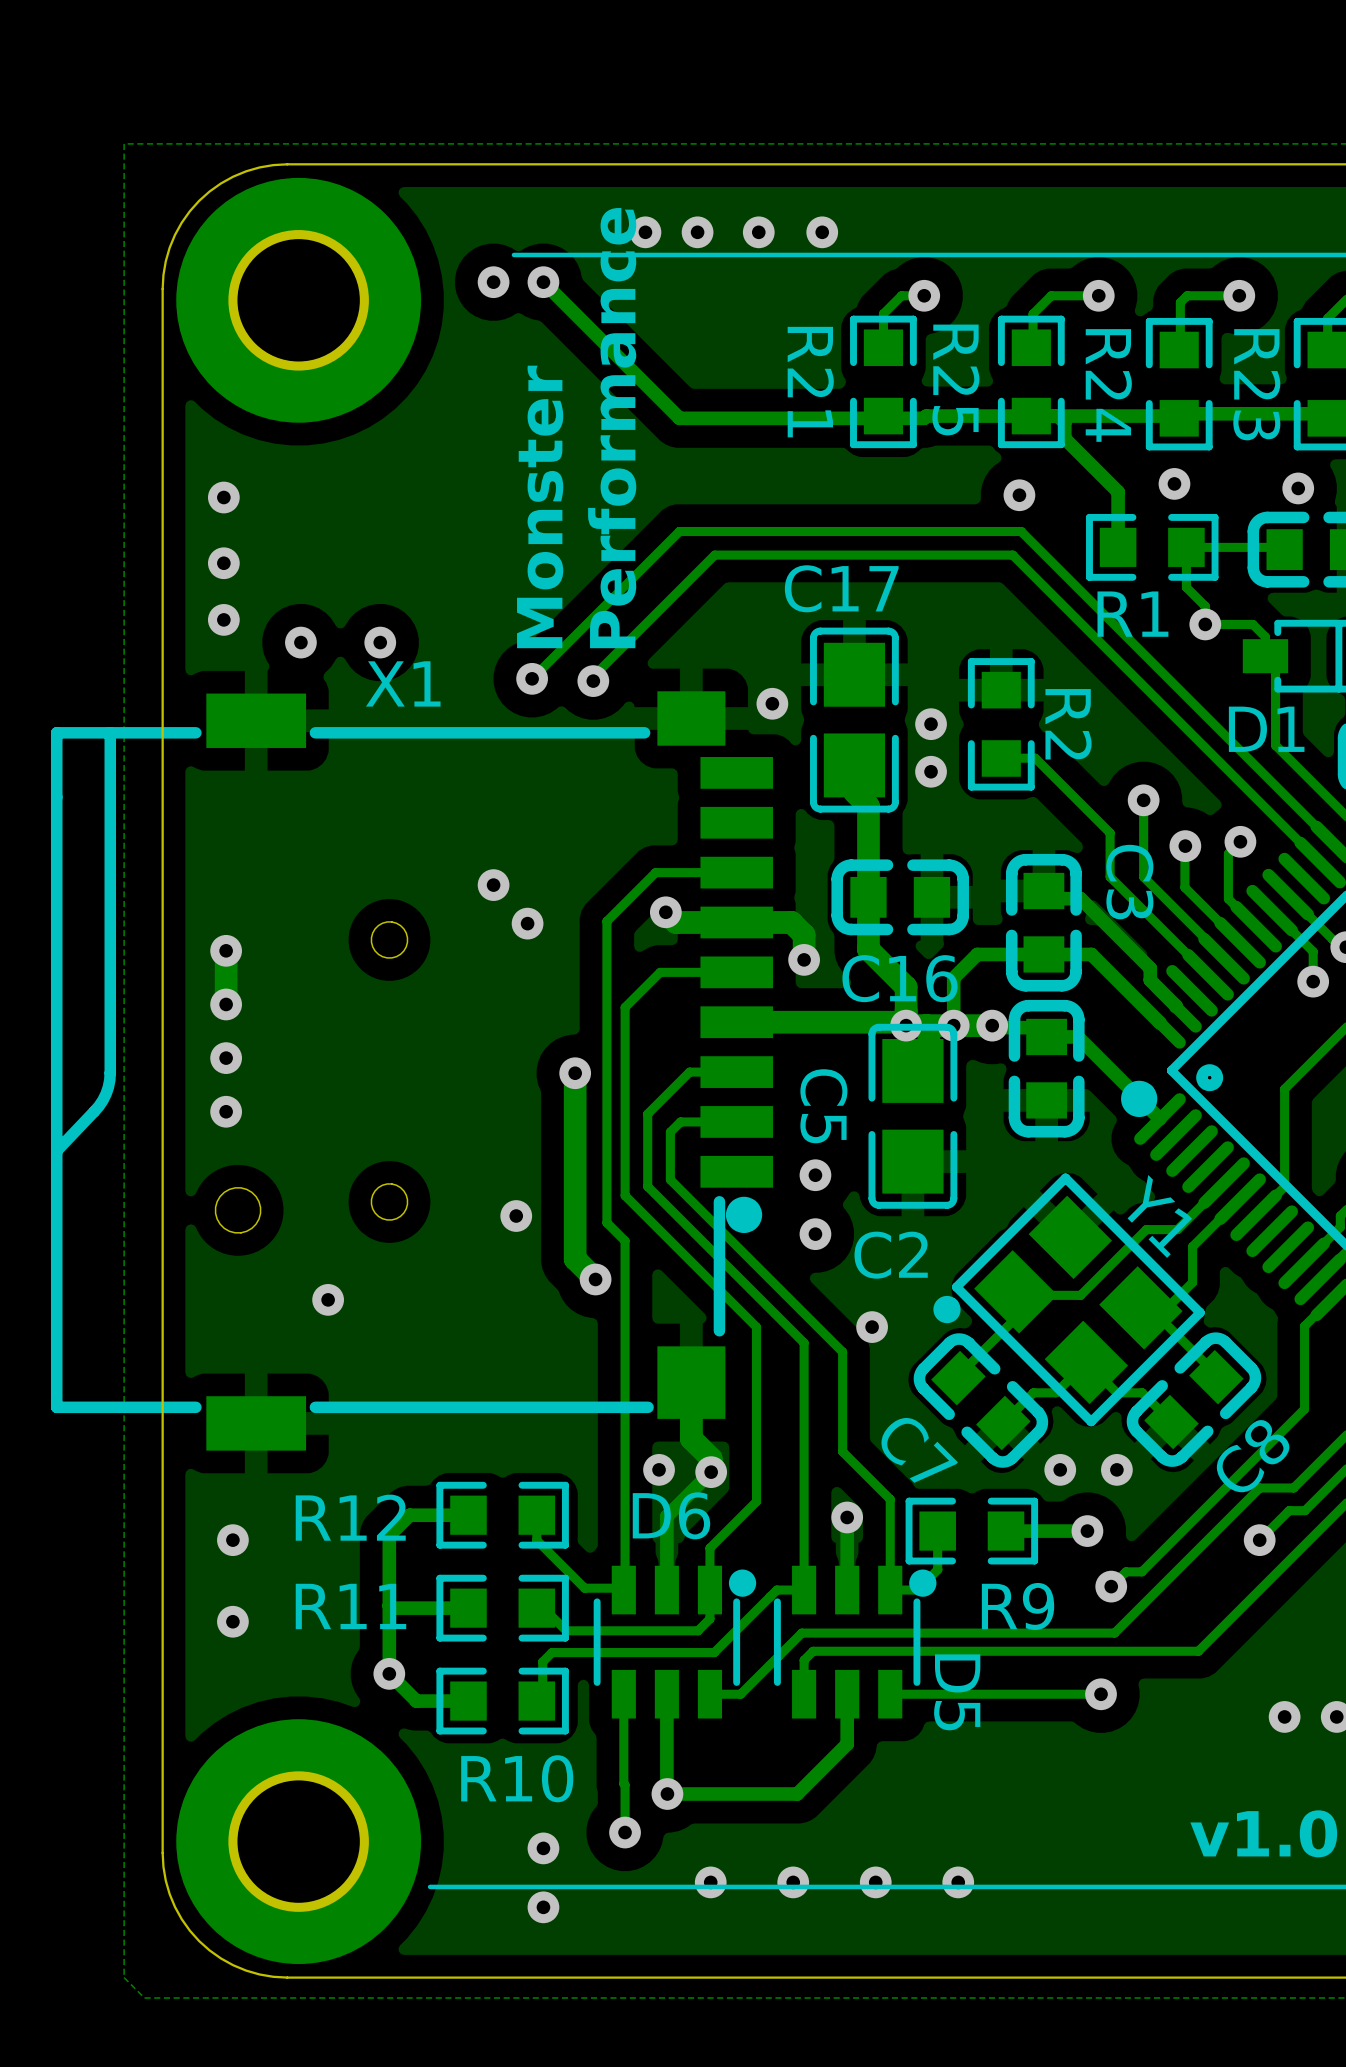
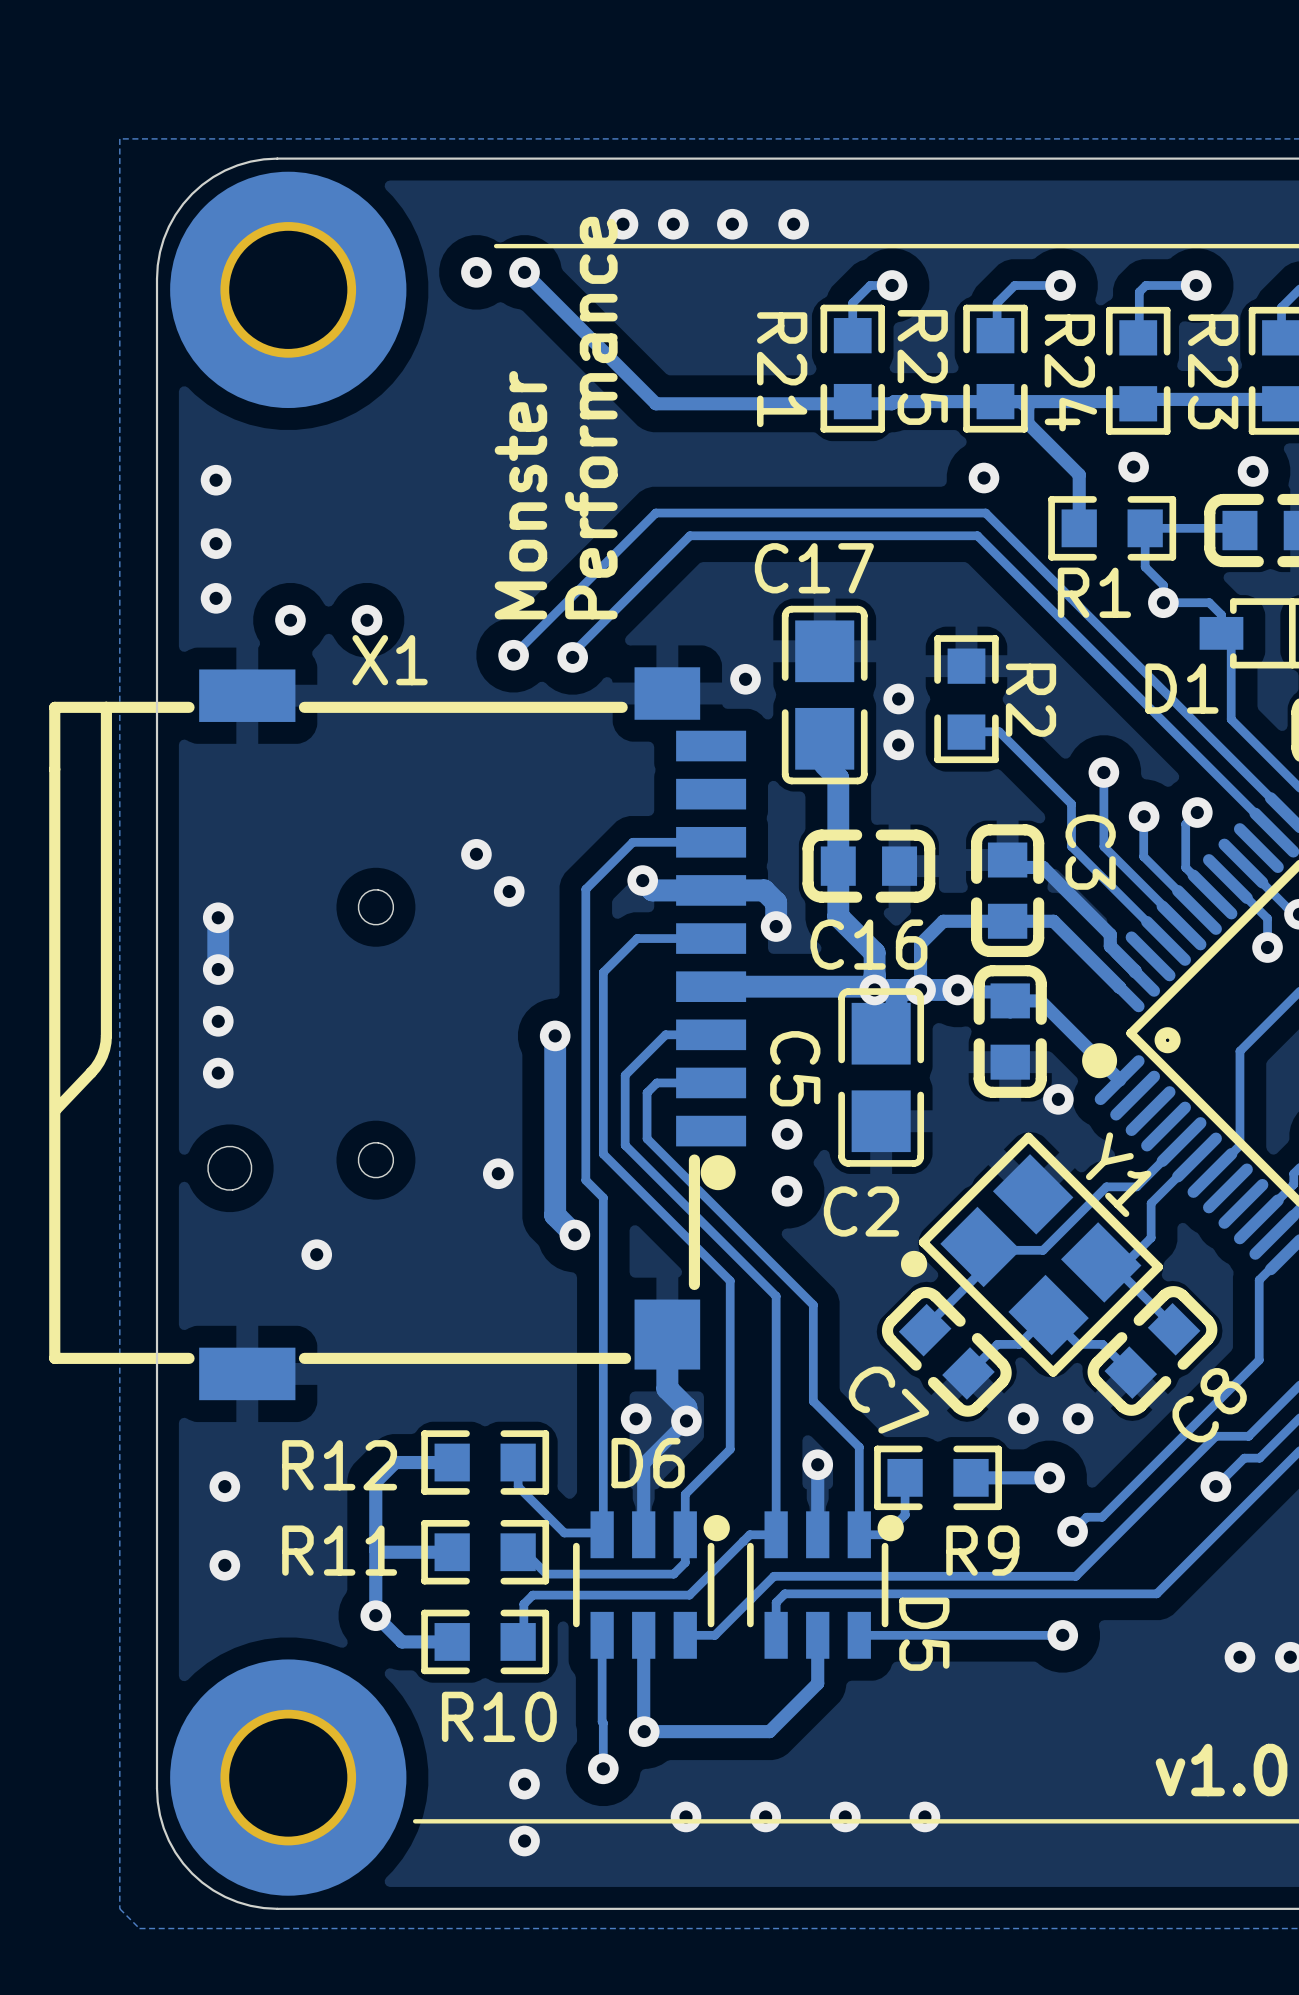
D1 name position: D1 (1266, 729) -> D1 (1181, 688)
via: none -> (1058, 1099)
via: (872, 1327) -> none

